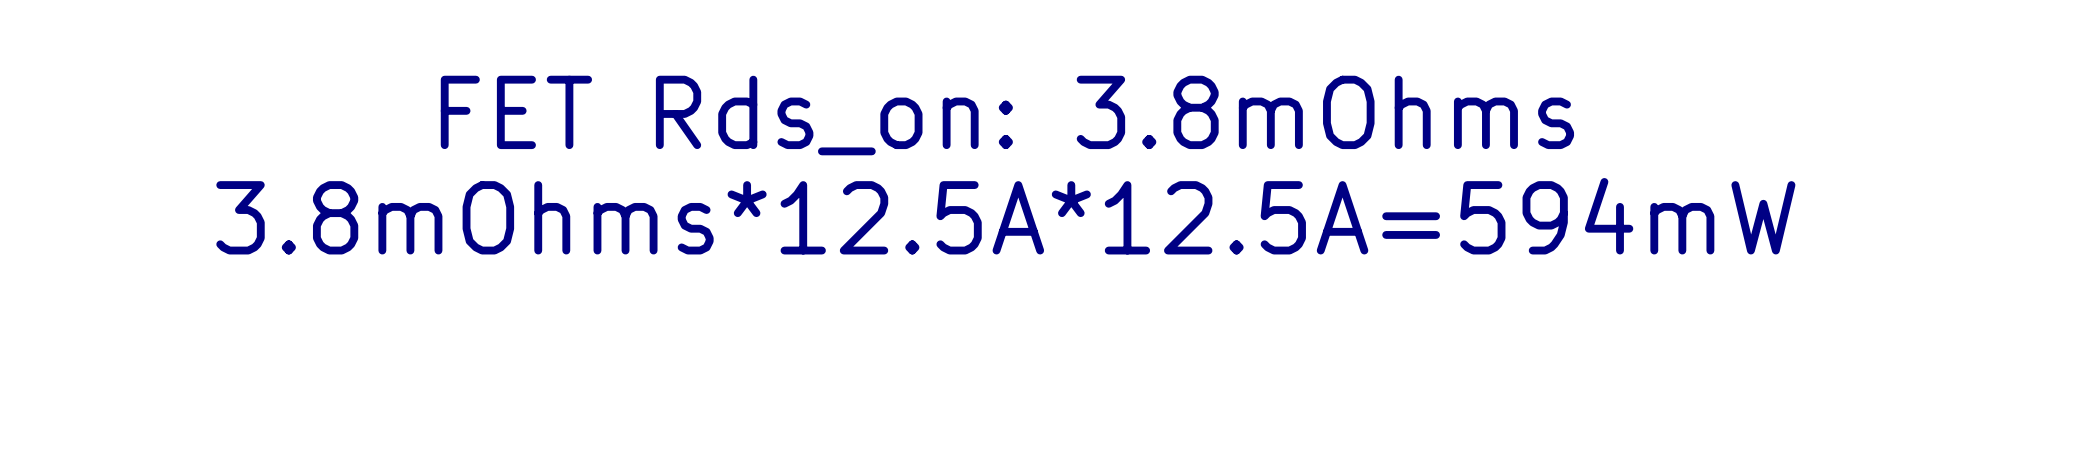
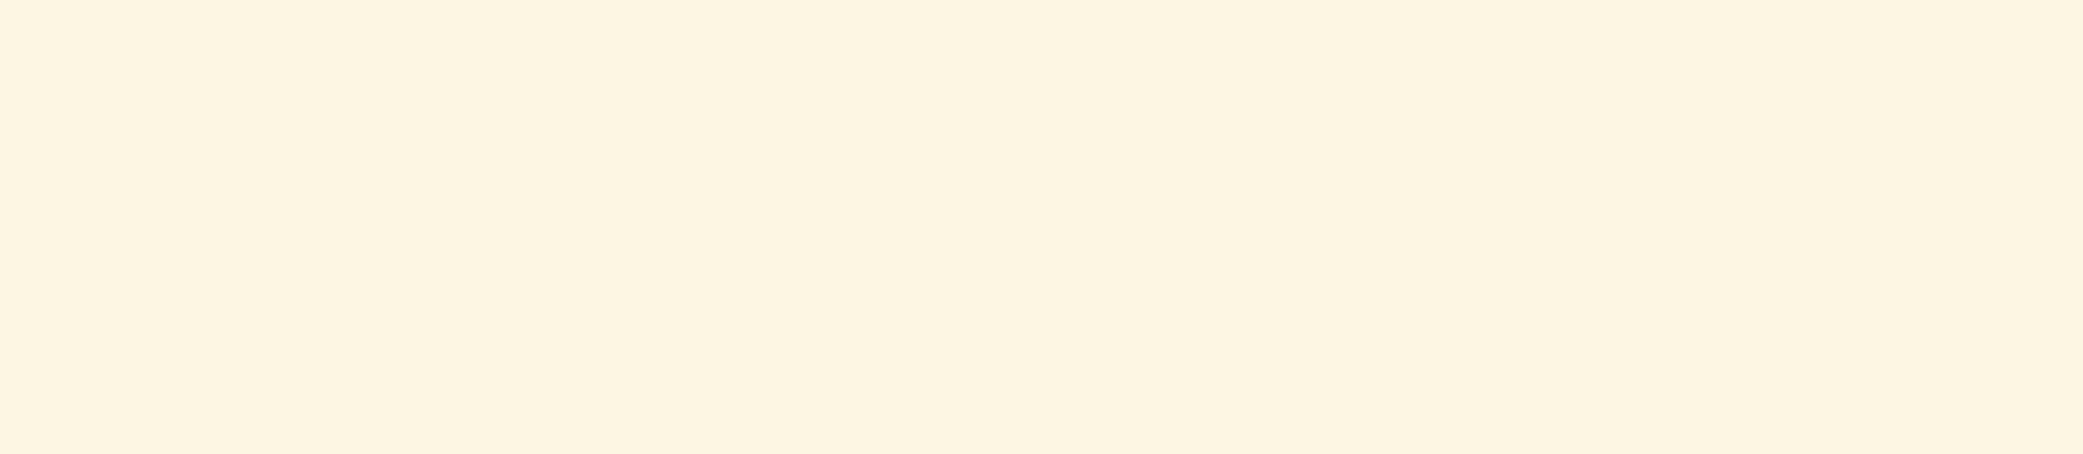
text: FET Rds_on: 3.8mOhms (1007, 115) -> none
text: 3.8mOhms*12.5A*12.5A=594mW (1005, 216) -> none

